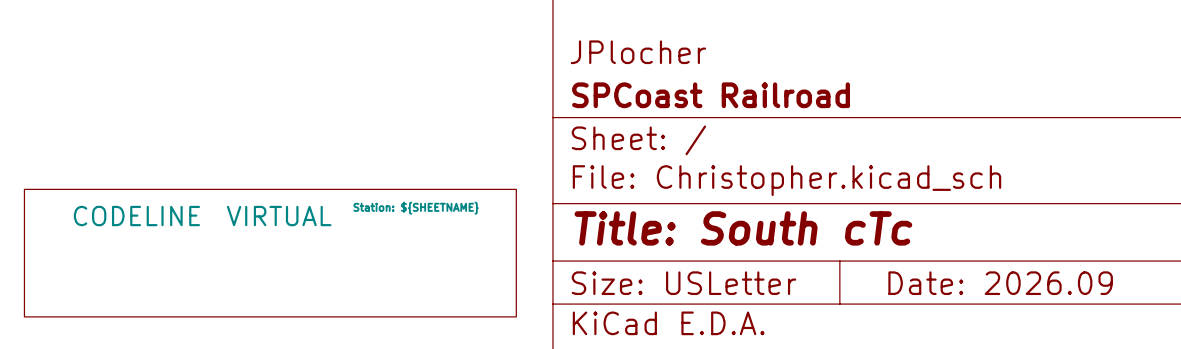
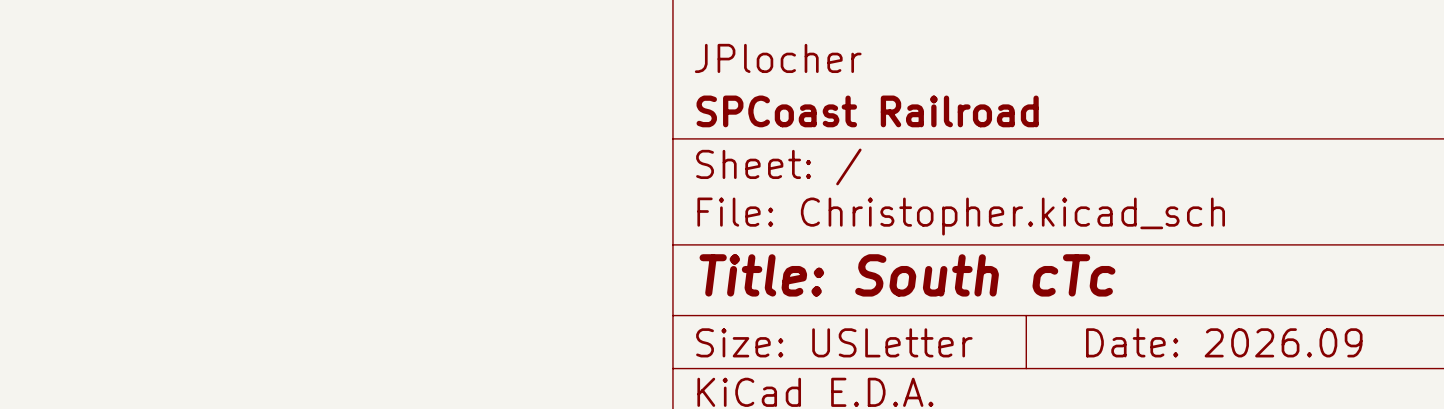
part: VIRTUAL (270, 253) -> none

